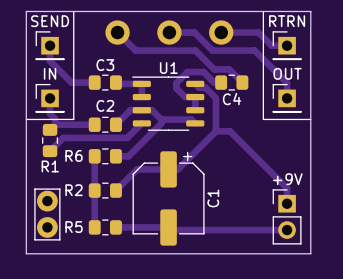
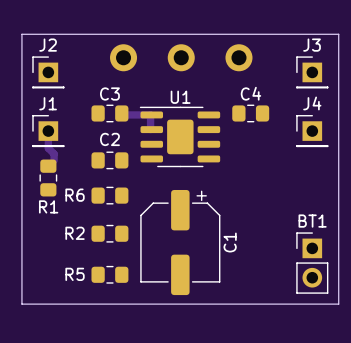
line: (73, 11) (73, 119) (26, 119) -> none
line: (263, 11) (263, 119) (310, 119) -> none
SEND name: SEND (50, 21) -> J2 (48, 45)
RTRN name: RTRN (287, 21) -> J3 (312, 45)
track: (117, 32) (135, 50) (195, 50) (214, 69) (229, 69) (242, 82) -> none
track: (169, 32) (194, 32) (212, 50) (254, 50) (287, 82) (287, 98) -> none
track: (221, 32) (258, 32) (271, 45) (287, 45) -> none
track: (50, 45) (50, 61) (71, 82) (94, 82) -> none
IN name: IN (50, 73) -> J1 (48, 103)
OUT name: OUT (287, 73) -> J4 (312, 103)
U1 footprint: [132, 76, 205, 131] -> [139, 106, 221, 168]
track: (221, 82) (214, 82) (203, 72) (187, 72) (176, 83) (176, 88) (185, 97) (195, 97) (195, 110) -> none
track: (195, 83) (199, 87) (205, 87) (215, 98) (215, 131) -> none
C4 name position: C4 (232, 99) -> C4 (250, 93)
track: (161, 119) (161, 123) (128, 156) (115, 156) -> none
track: (161, 119) (191, 119) (195, 123) -> none
track: (161, 119) (151, 110) (130, 110) (115, 124) -> none
track: (141, 123) (127, 137) (63, 137) (50, 151) -> none
track: (94, 124) (55, 124) (50, 129) -> none
track: (215, 131) (230, 131) (287, 188) (287, 203) -> none
track: (215, 131) (177, 169) (137, 169) (115, 190) -> none
track: (94, 156) (94, 227) -> none
+9V name: +9V (287, 179) -> BT1 (312, 221)
part: (47, 214) -> none
track: (115, 227) (168, 227) (171, 230) (287, 230) -> none

